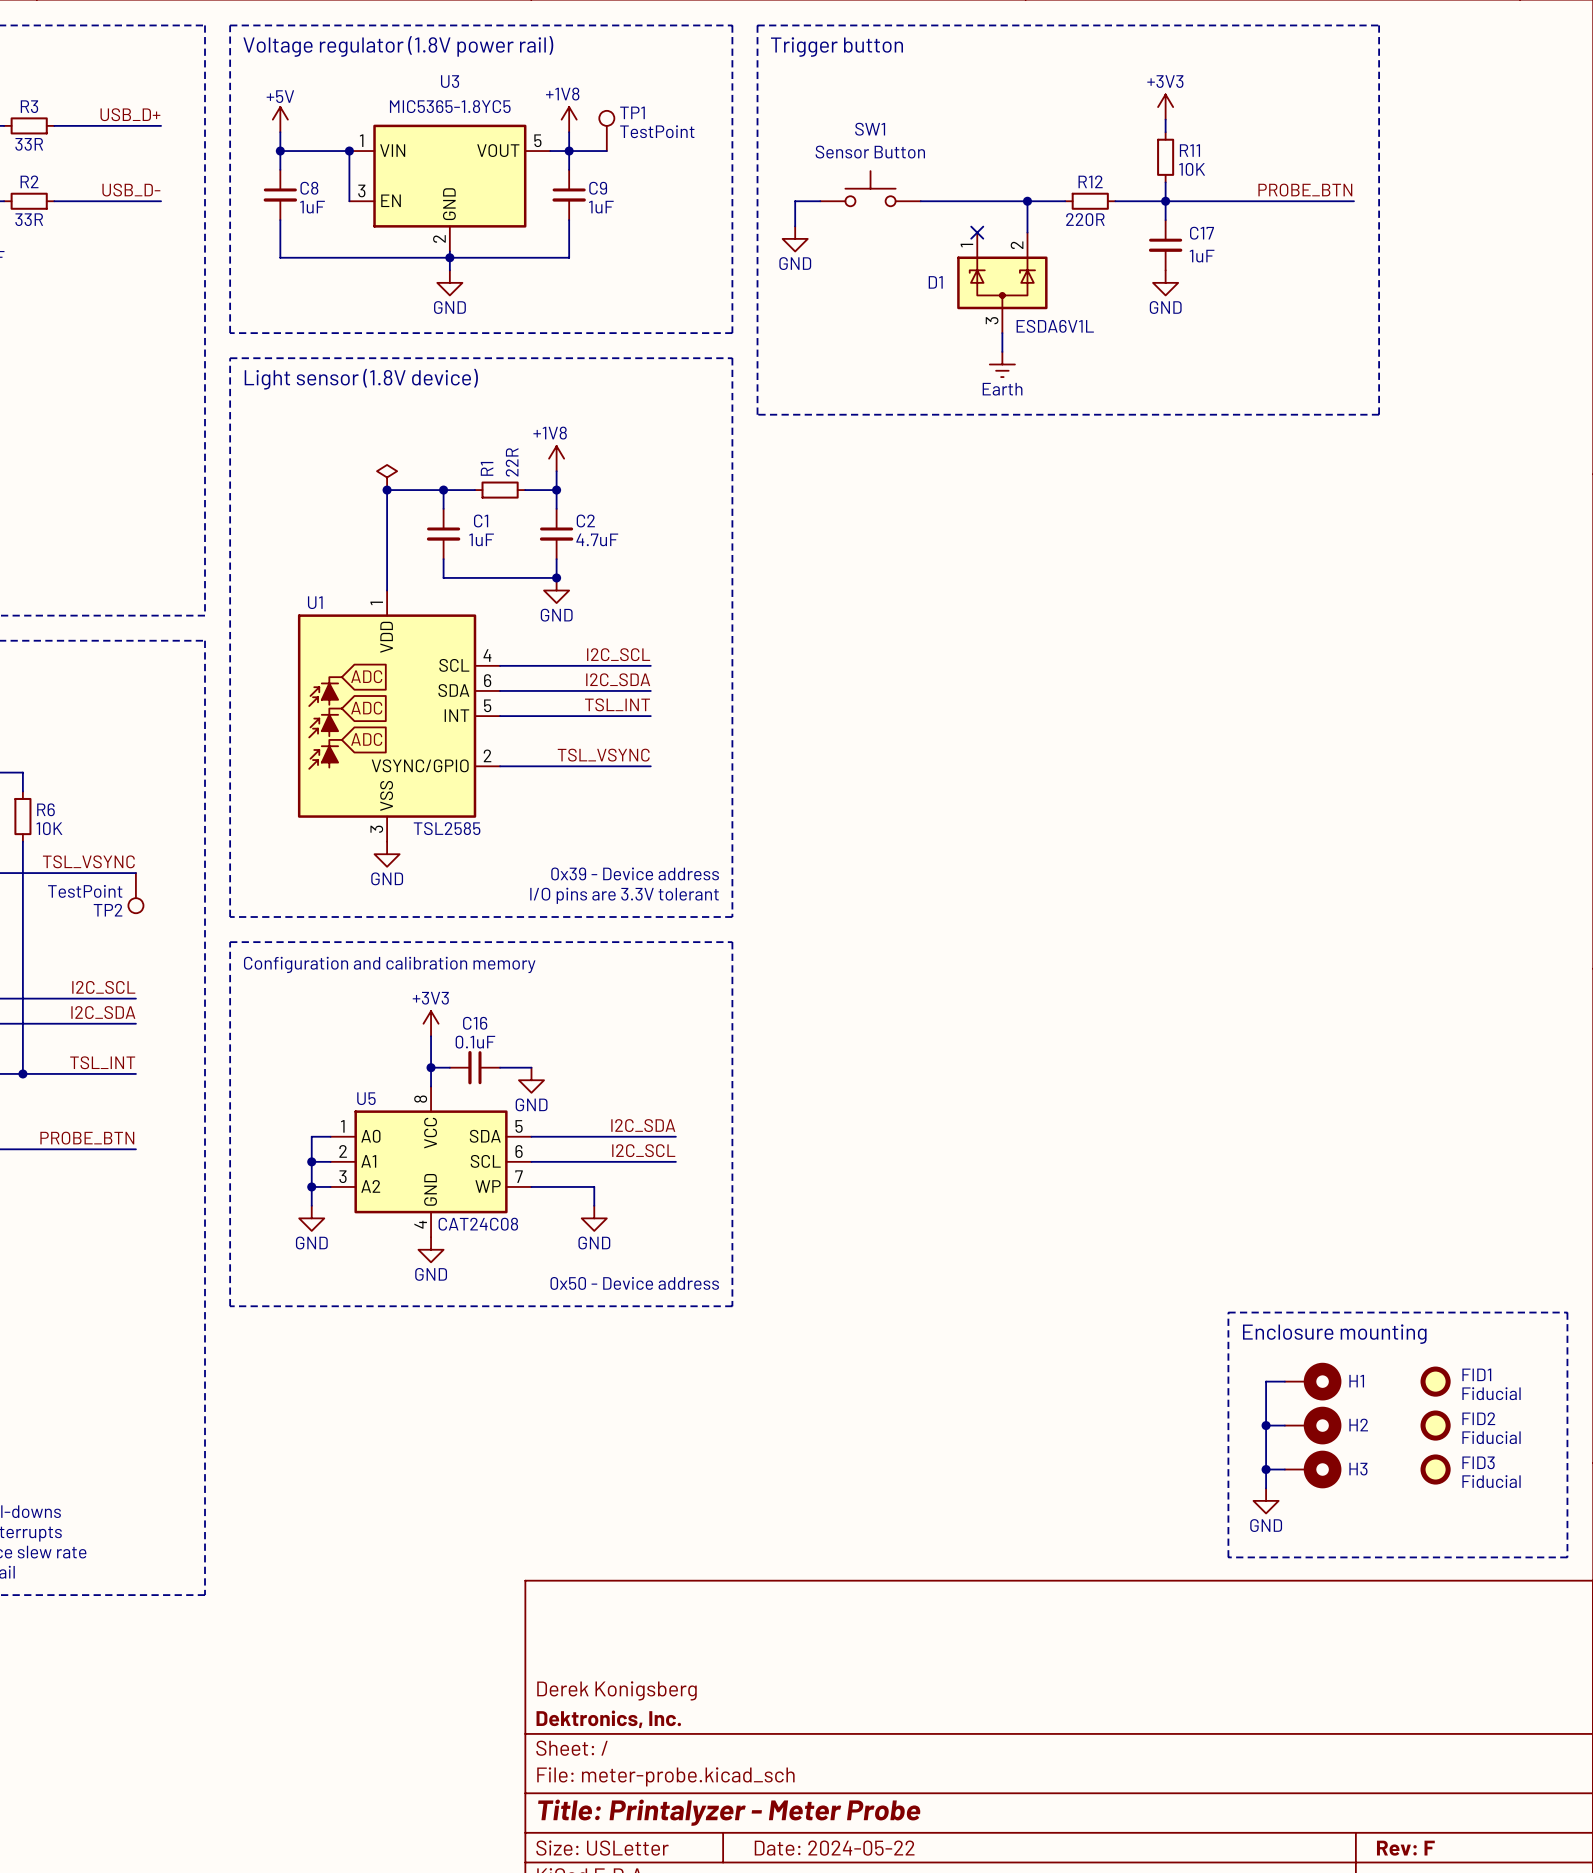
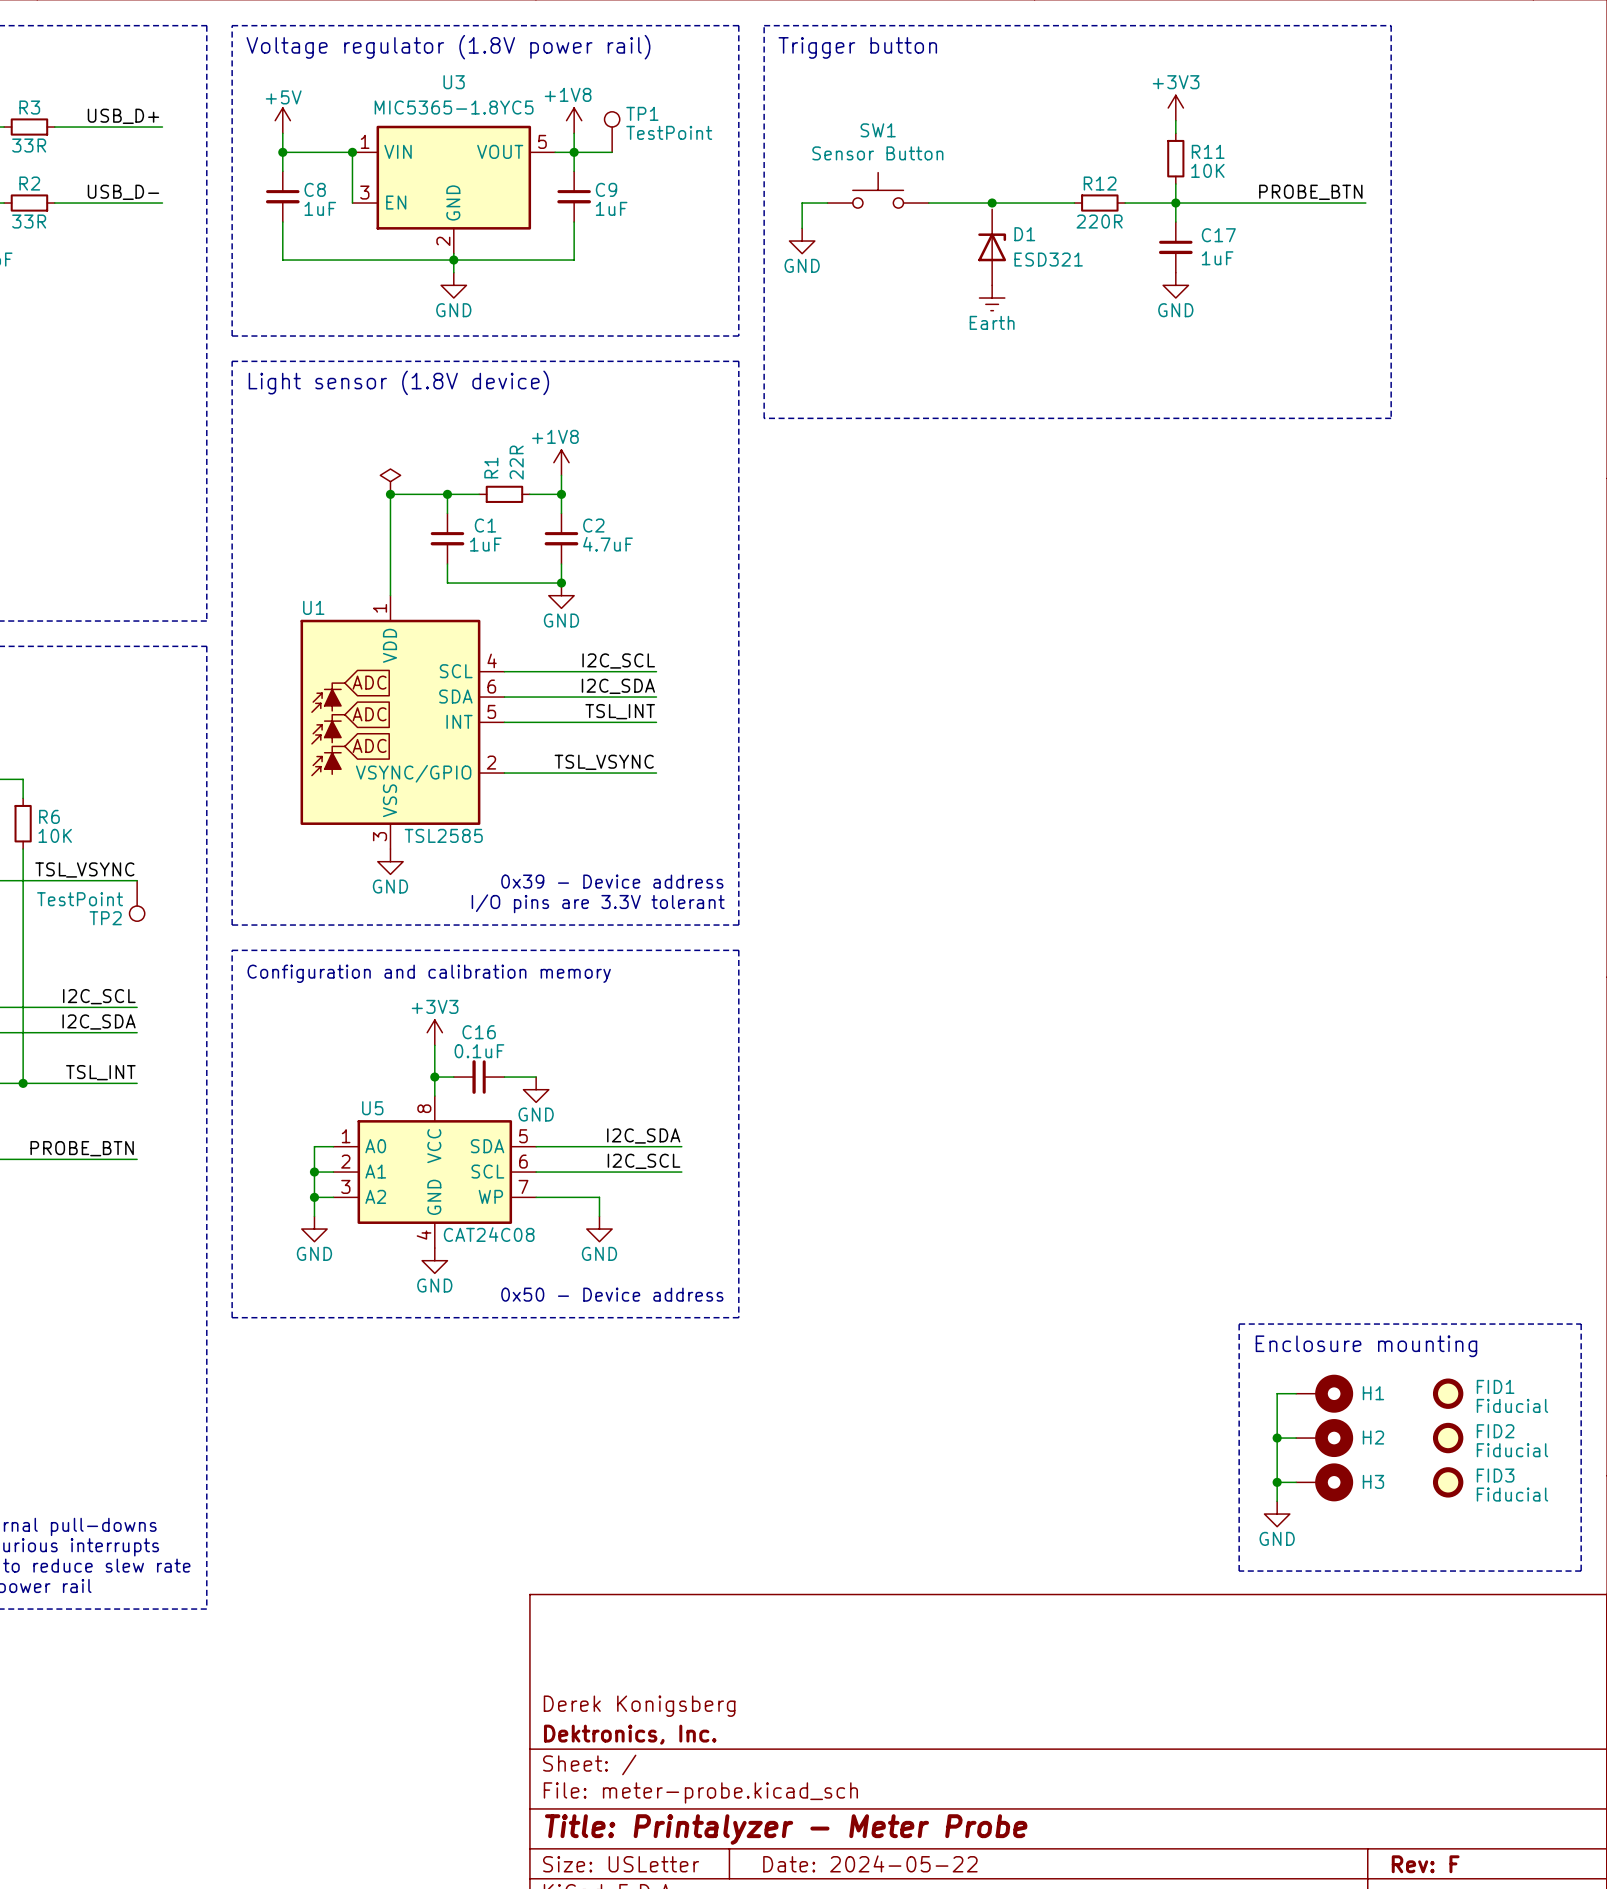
wire: (1027, 201) (1027, 232) -> none
junction position: (1027, 201) -> (992, 203)
D1 symbol: [957, 232, 1048, 334] -> [978, 209, 1007, 286]
no-connect mark: (977, 232) -> none
D1 name position: D1 (935, 282) -> D1 (1024, 234)
D1 value: ESDA6V1L (1055, 326) -> ESD321 (1048, 259)
wire: (1002, 333) (1002, 351) -> none
power symbol position: Earth (1002, 364) -> Earth (992, 298)

